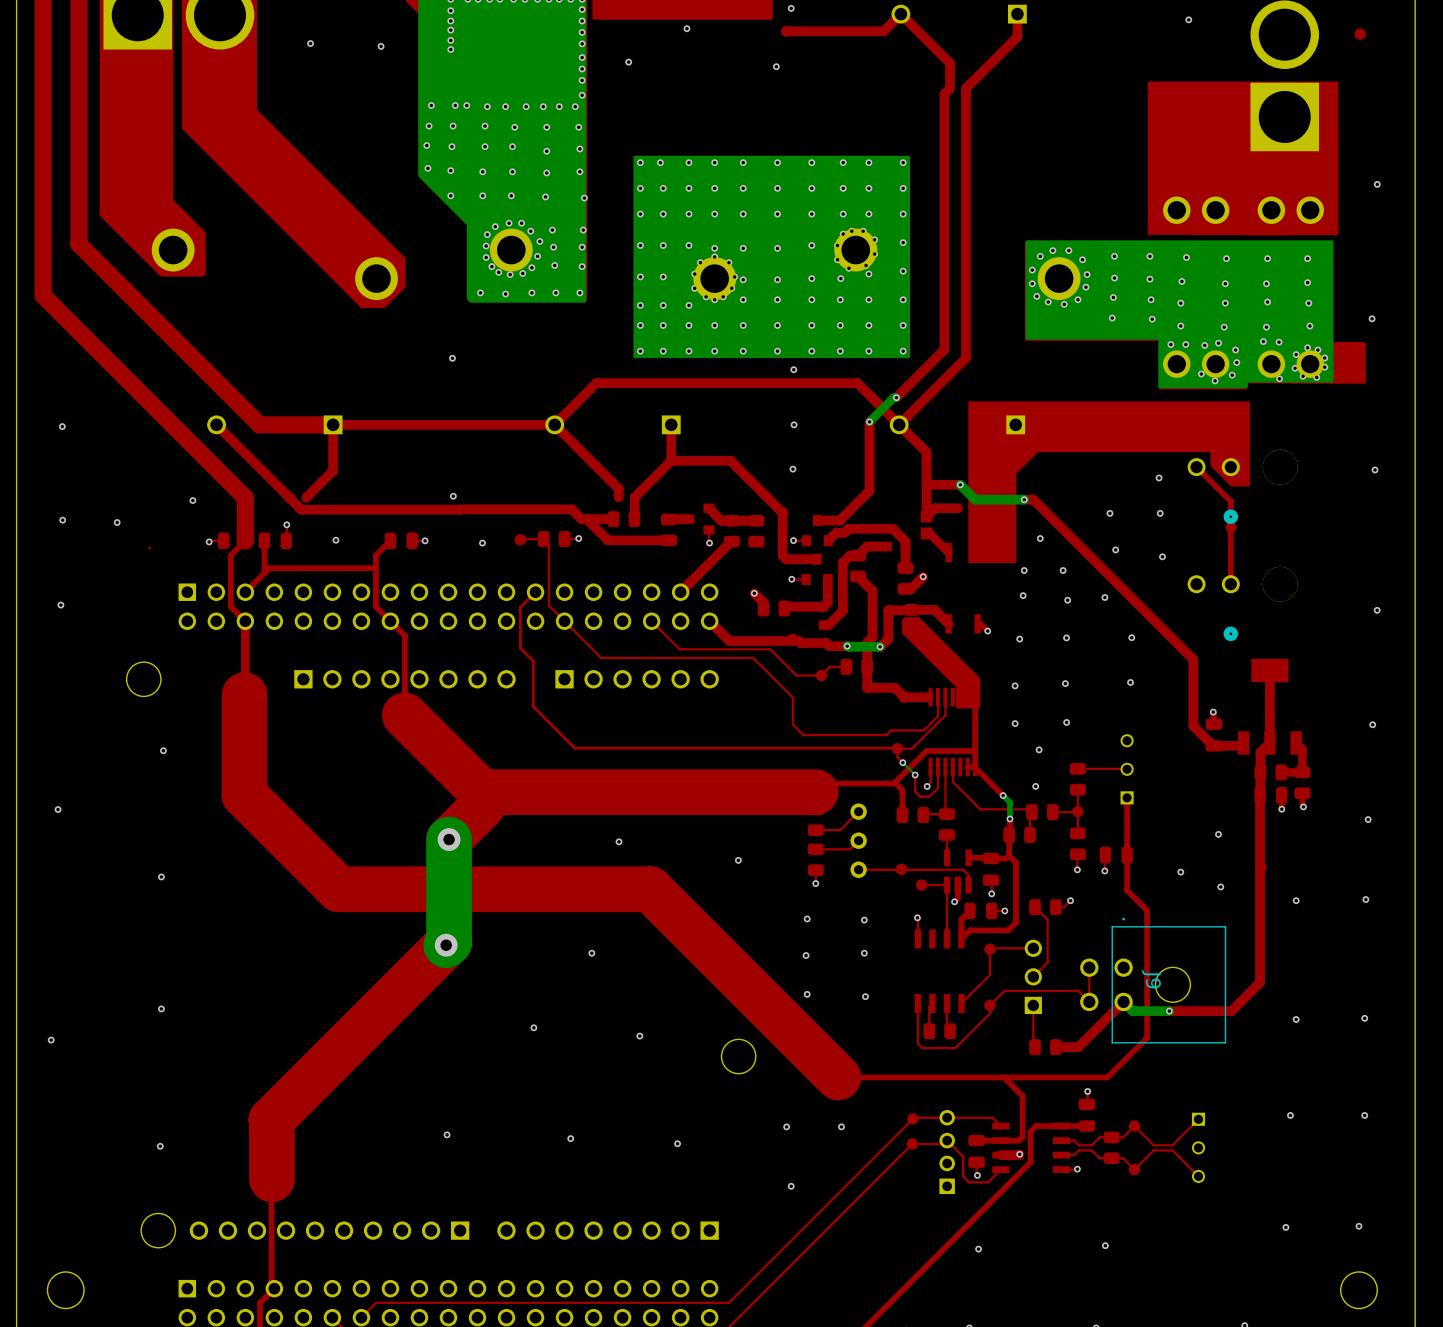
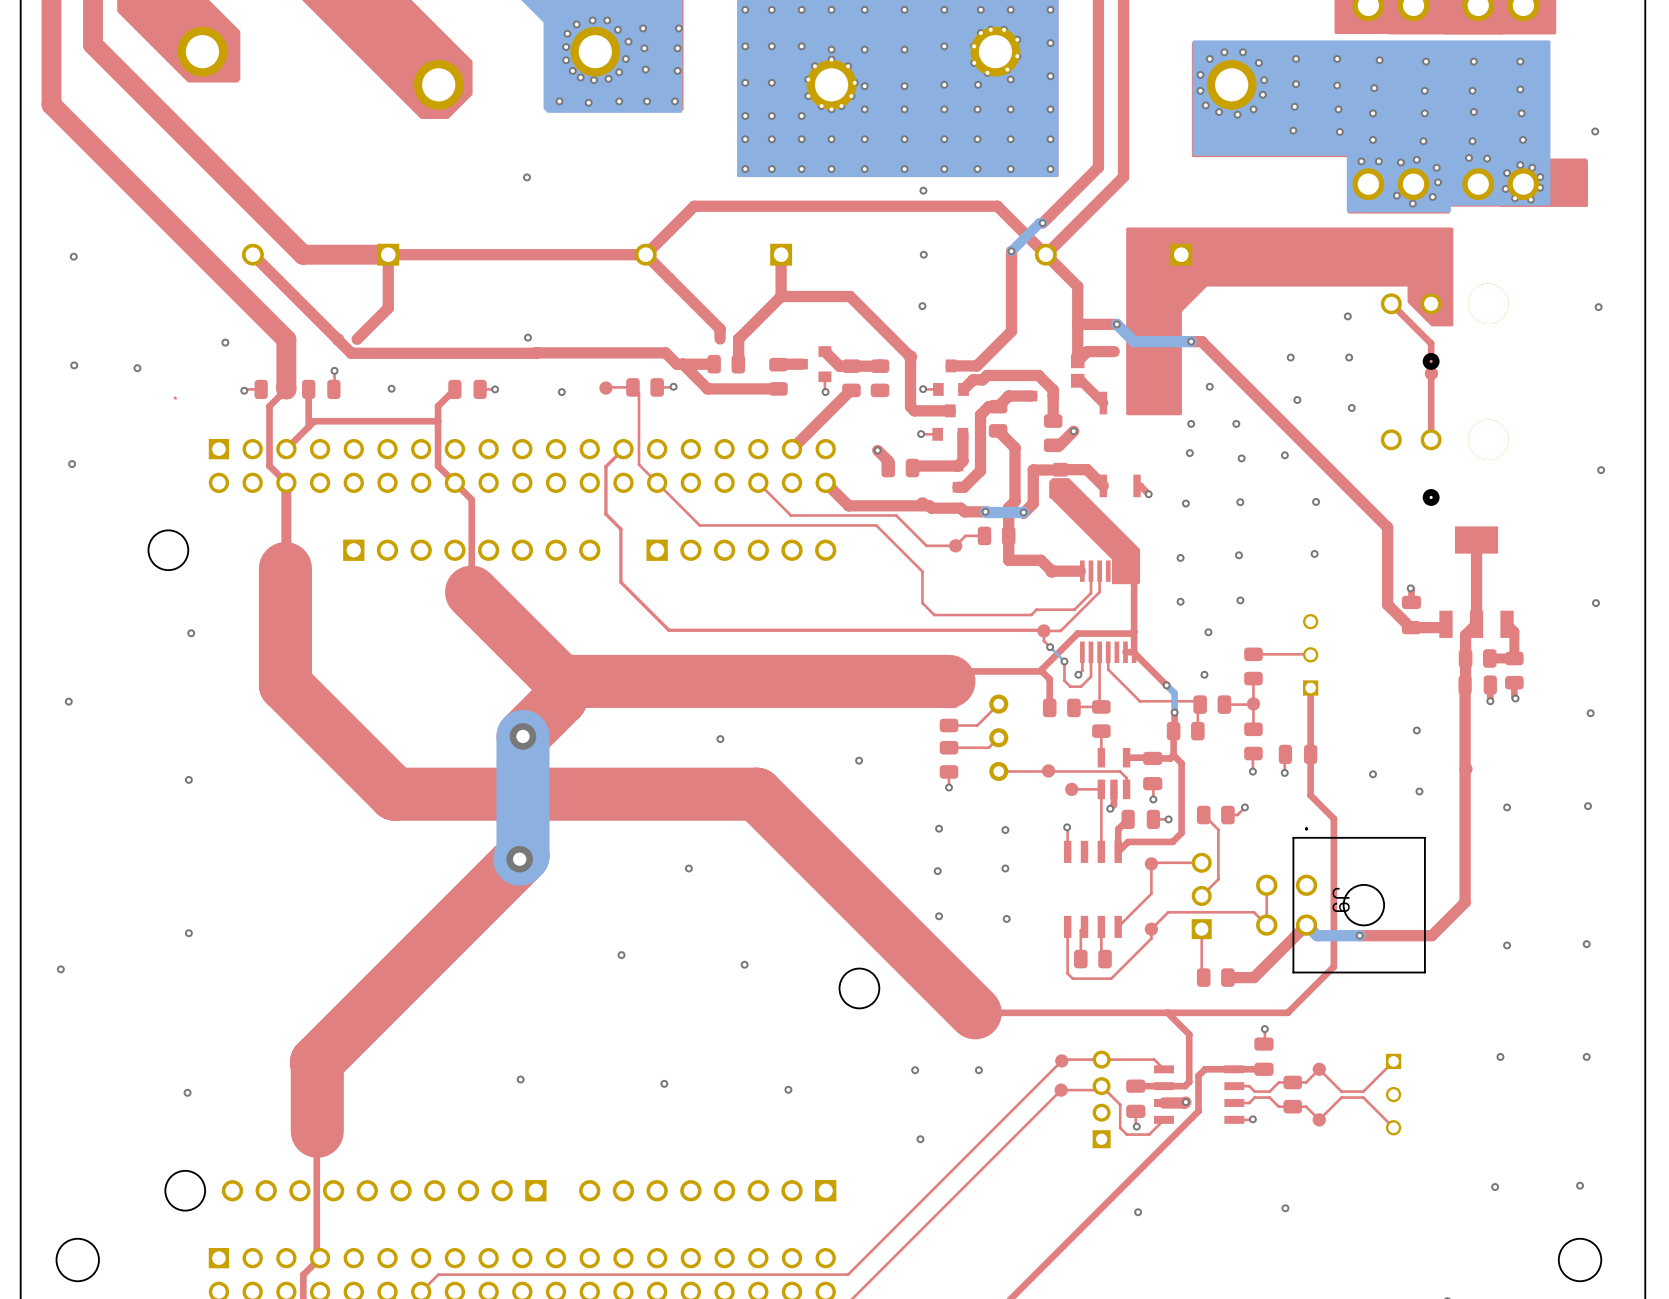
via: (1279, 378) -> none

